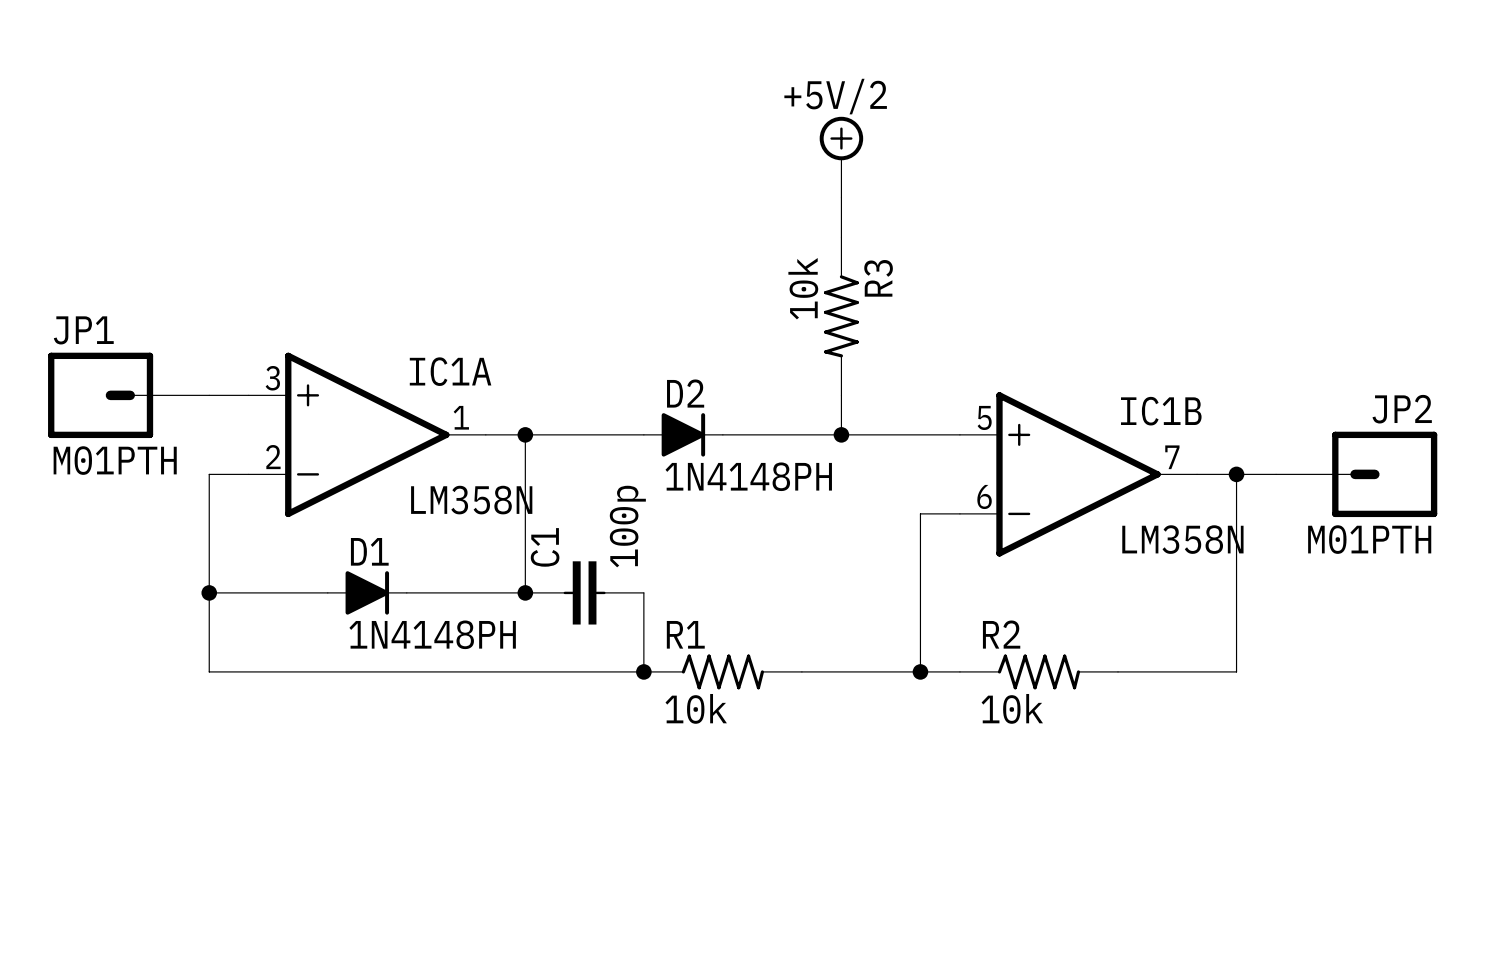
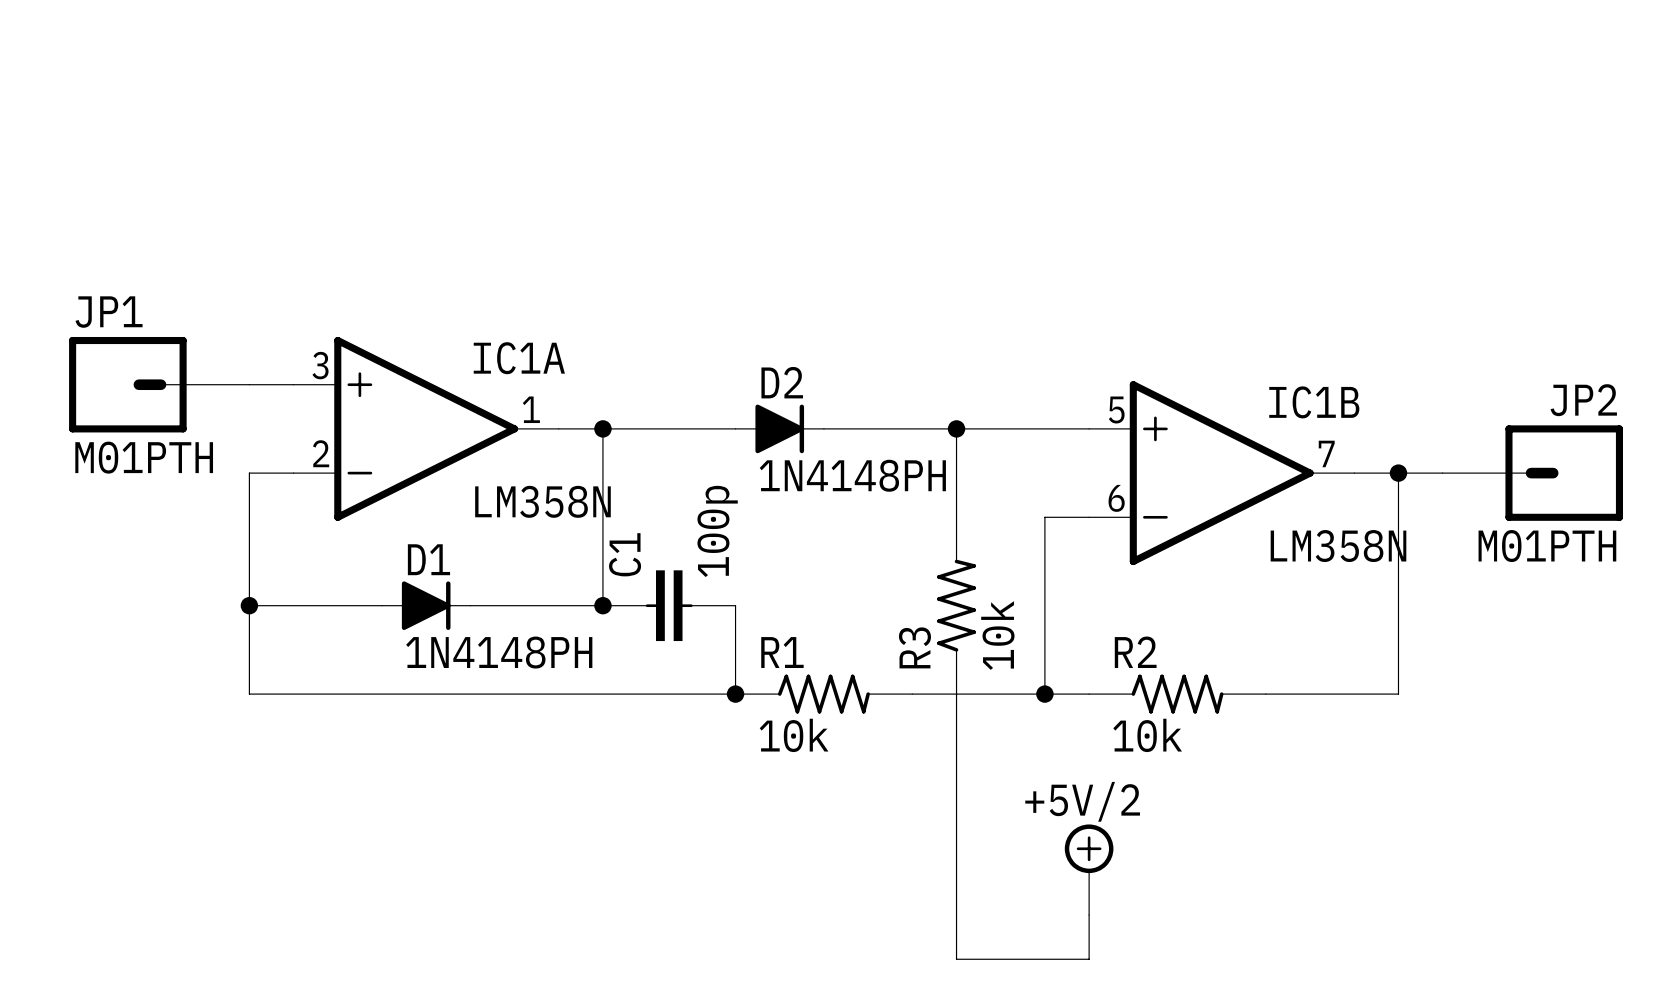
power symbol: +5V/2 (841, 157) -> none
wire: (841, 197) (841, 237) -> none
R3 rotation: 0° (841, 316) -> 180° (956, 605)
R3 position: (841, 316) -> (956, 605)
wire: (841, 395) (841, 434) -> (956, 517) (956, 428)
wire: none -> (956, 694) (956, 959) (1089, 959) (1089, 915)
power symbol: none -> +5V/2 (1089, 869)

